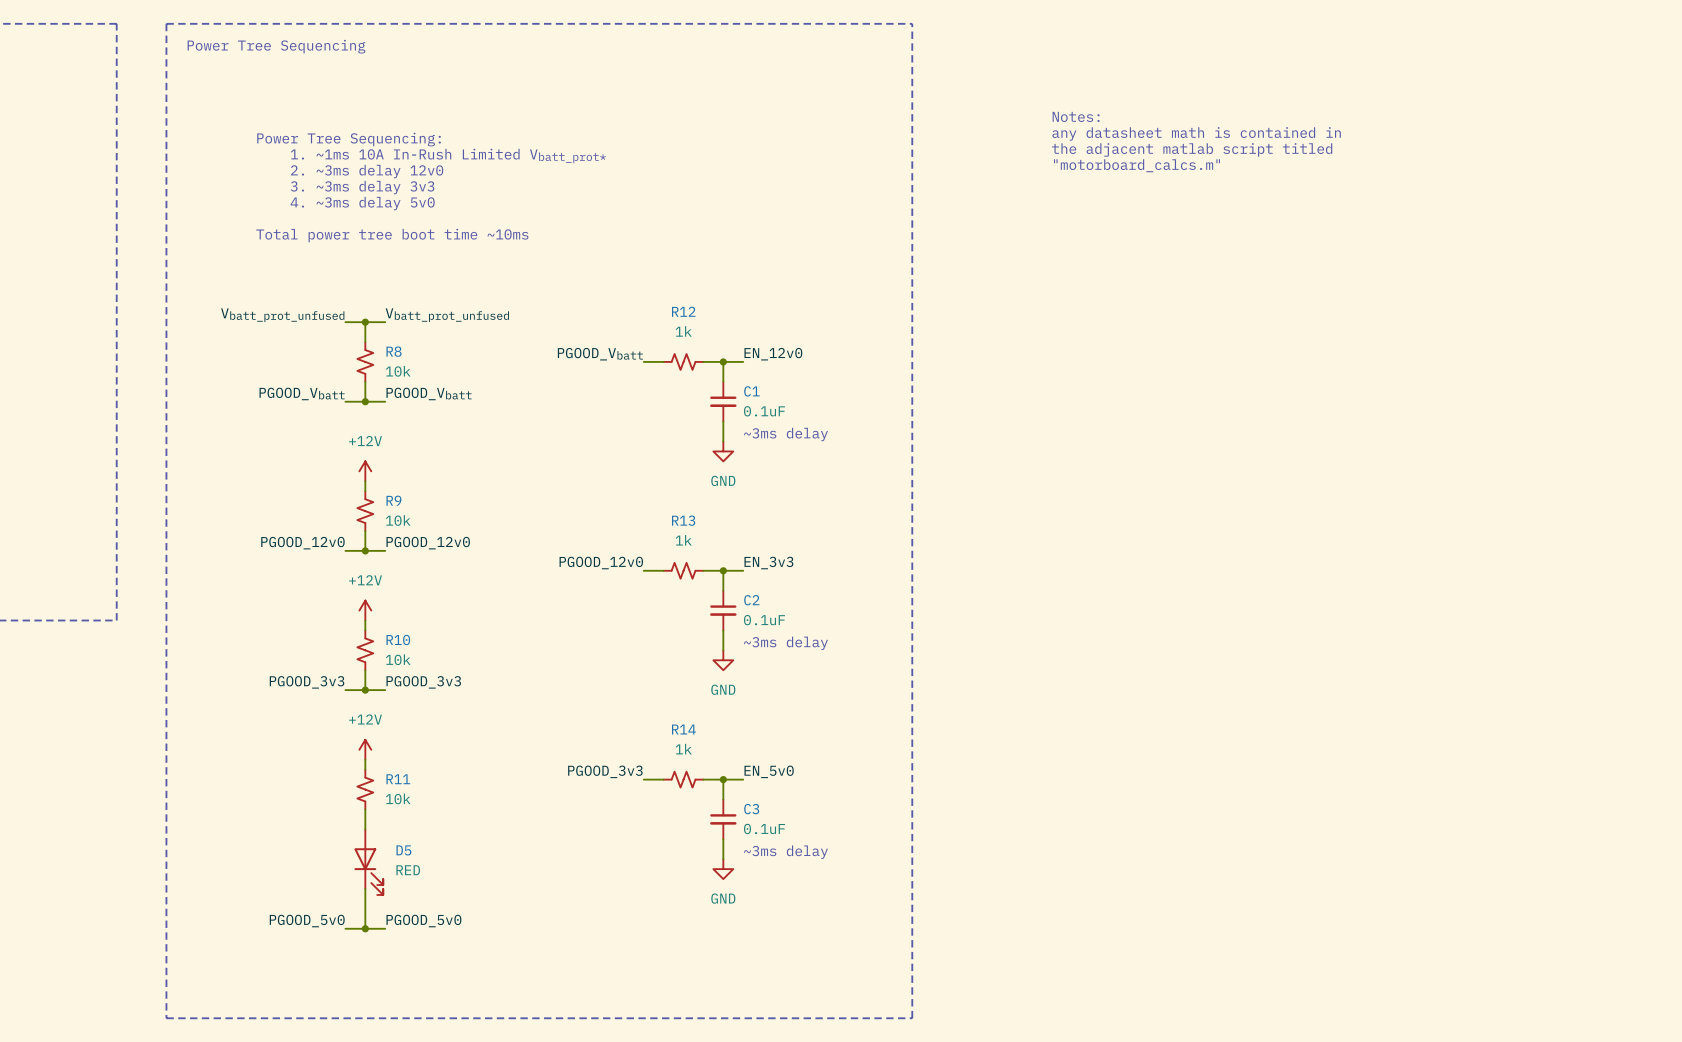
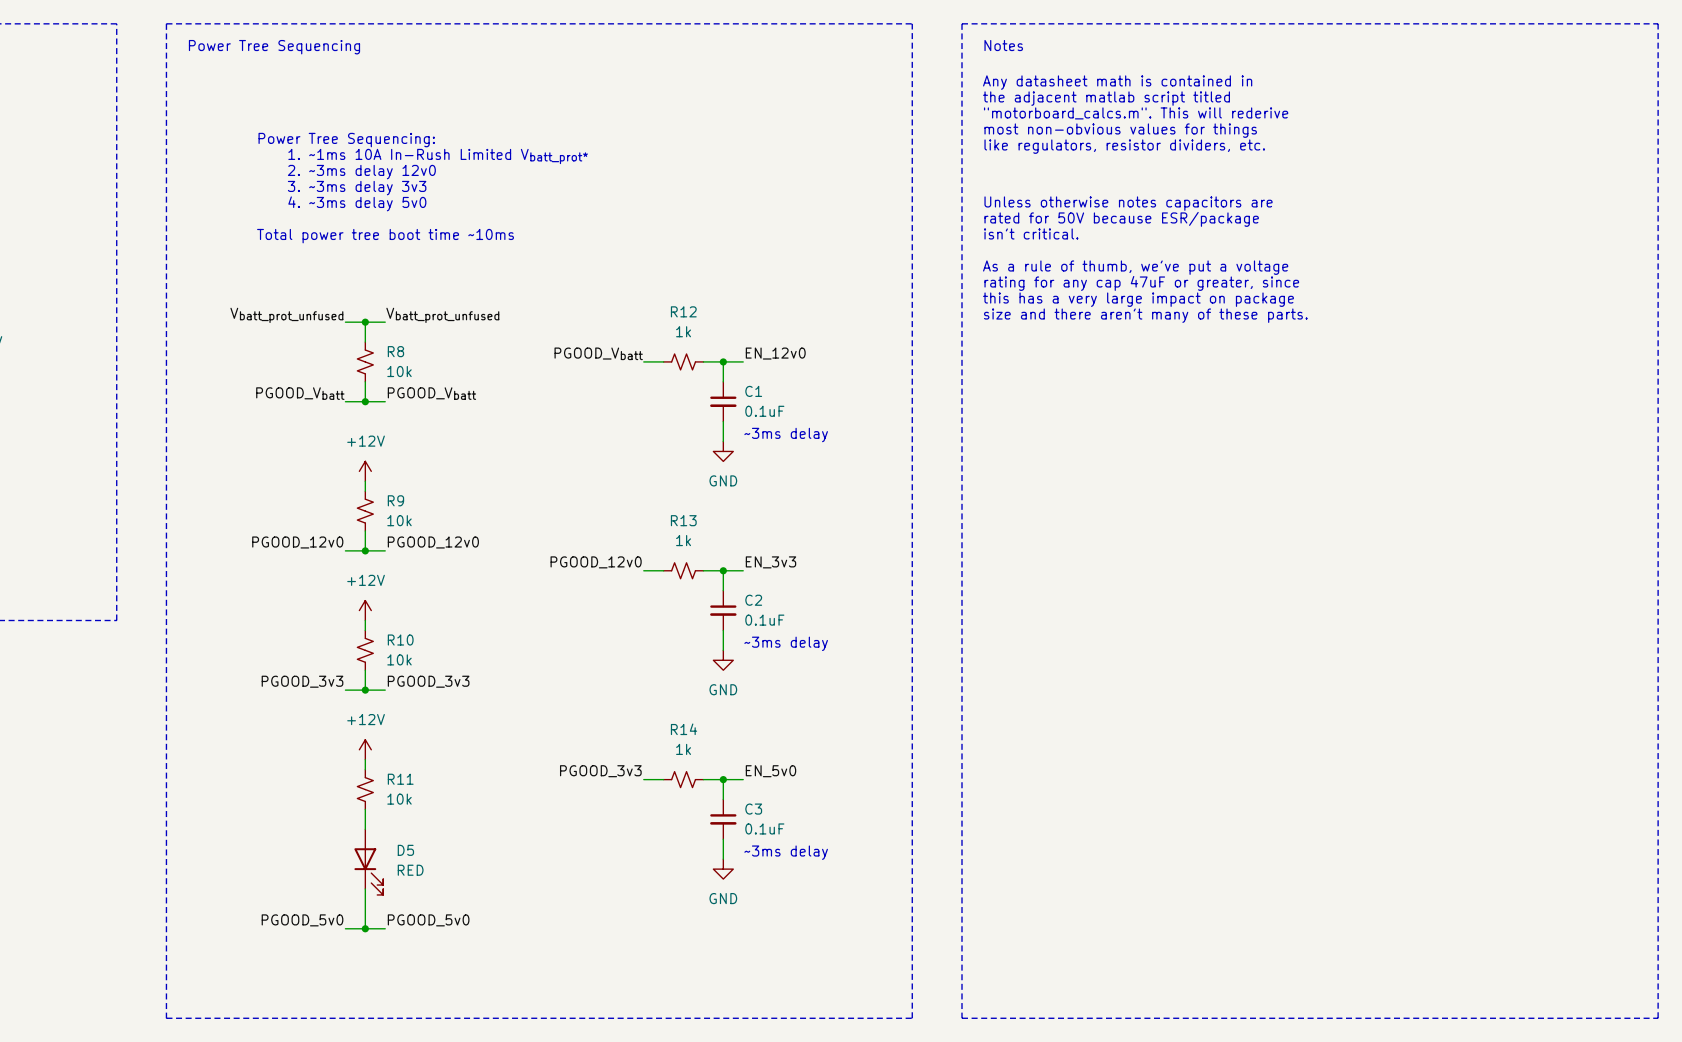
line: none -> (961, 23) (961, 1018) (1658, 1018) (1658, 23) (961, 23)
text: none -> Notes (1003, 45)
text: none -> Any datasheet math is contained in (1117, 82)
text: none -> "motorboard_calcs.m". This will rederive (1136, 113)
text: Notes: (1076, 116) -> none
text: none -> most non-obvious values for things (1120, 130)
text: any datasheet math is contained in (1196, 133) -> none
text: none -> like regulators, resistor dividers, etc. (1124, 146)
text position: the adjacent matlab script titled (1192, 149) -> the adjacent matlab script titled (1106, 98)
text: "motorboard_calcs.m" (1136, 165) -> none
text: none -> Unless otherwise notes capacitors are (1128, 203)
text: none -> rated for 50V because ESR/package (1121, 219)
text: none -> isn't critical. (1031, 233)
text: none -> As a rule of thumb, we've put a voltage (1135, 267)
text: none -> rating for any cap 47uF or greater, since (1141, 283)
text: none -> this has a very large impact on package (1138, 299)
text: none -> size and there aren't many of these parts. (1145, 315)

